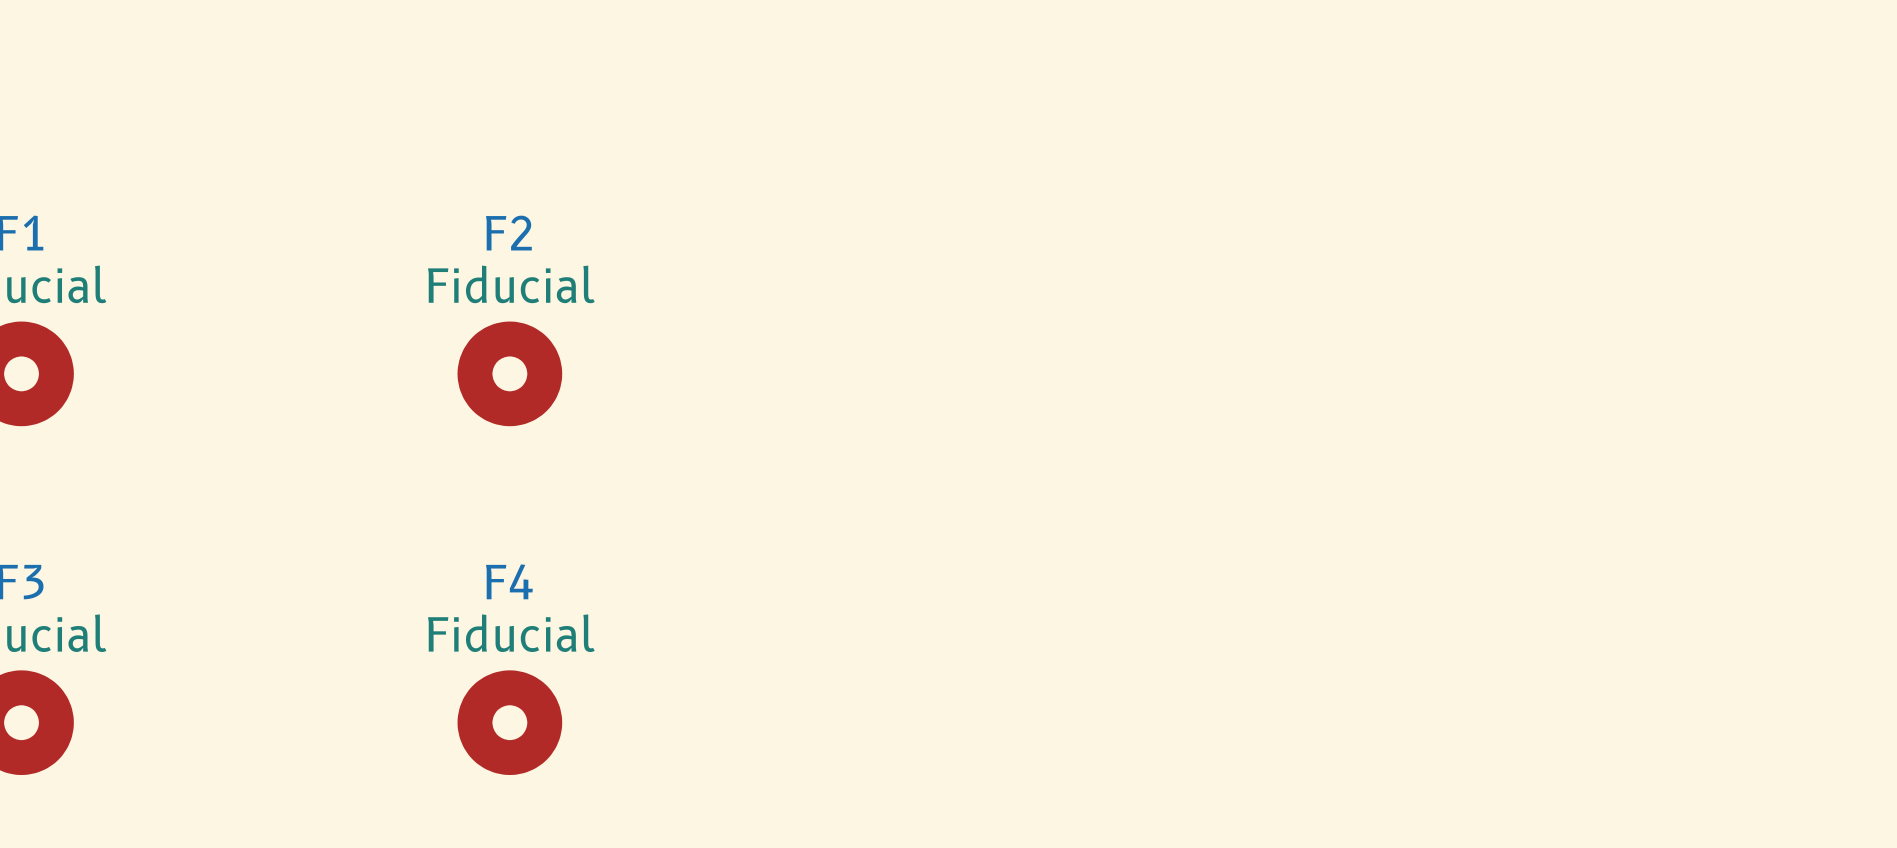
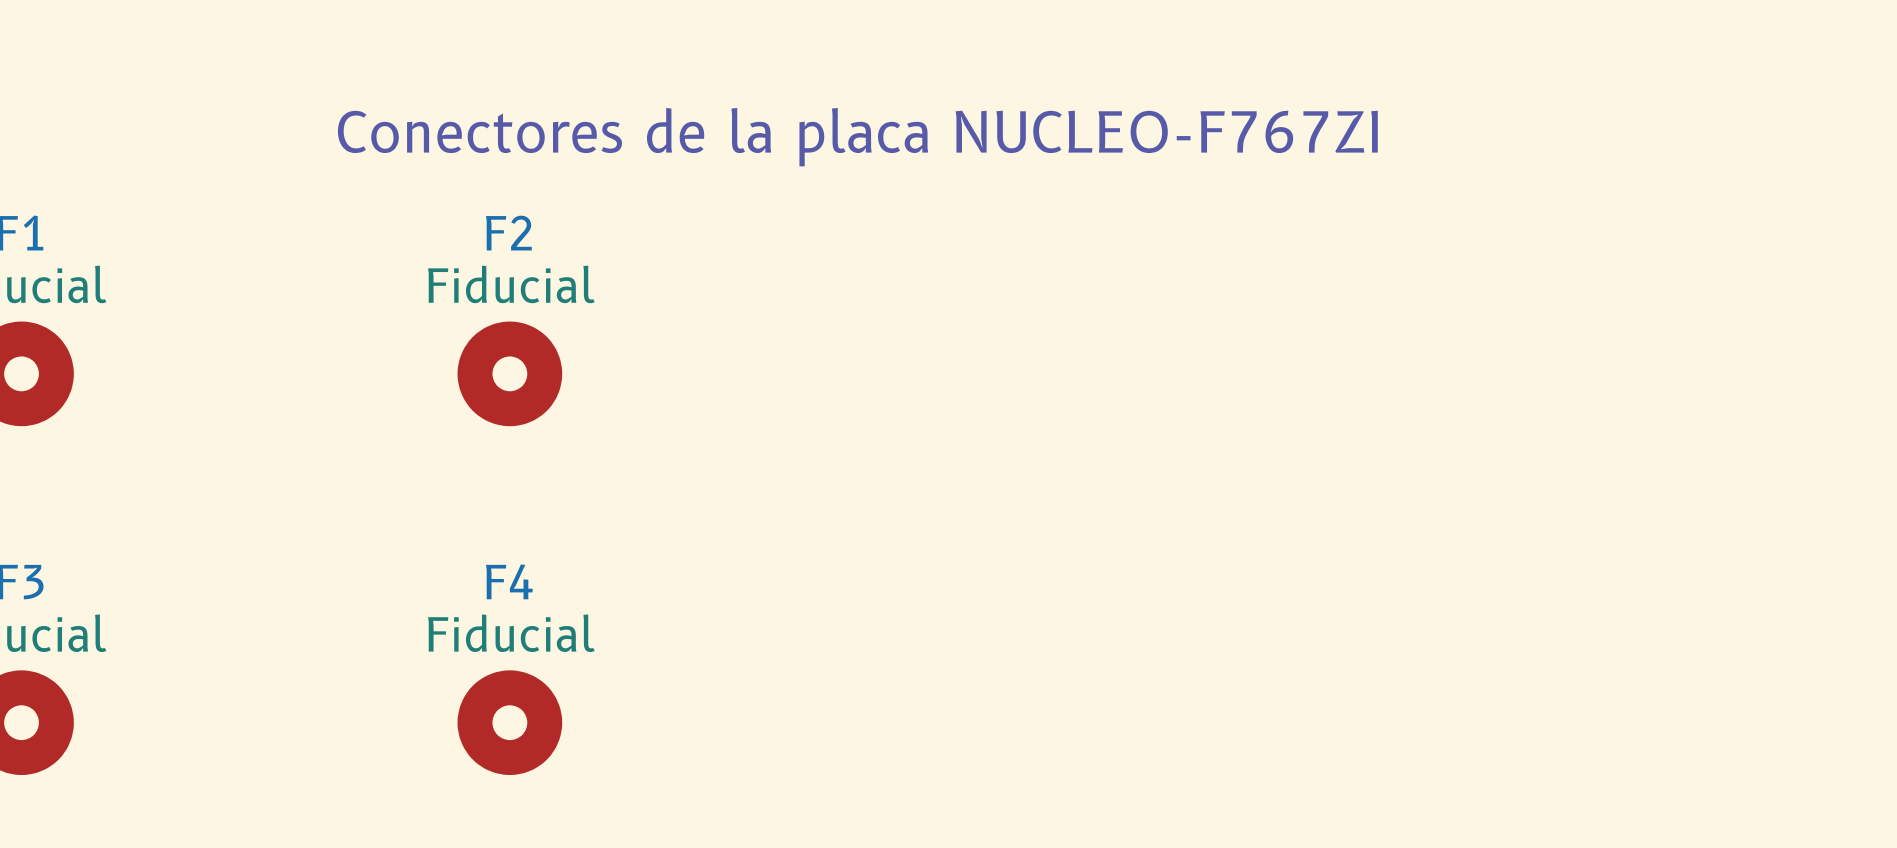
text: none -> Conectores de la placa NUCLEO-F767ZI (857, 137)

